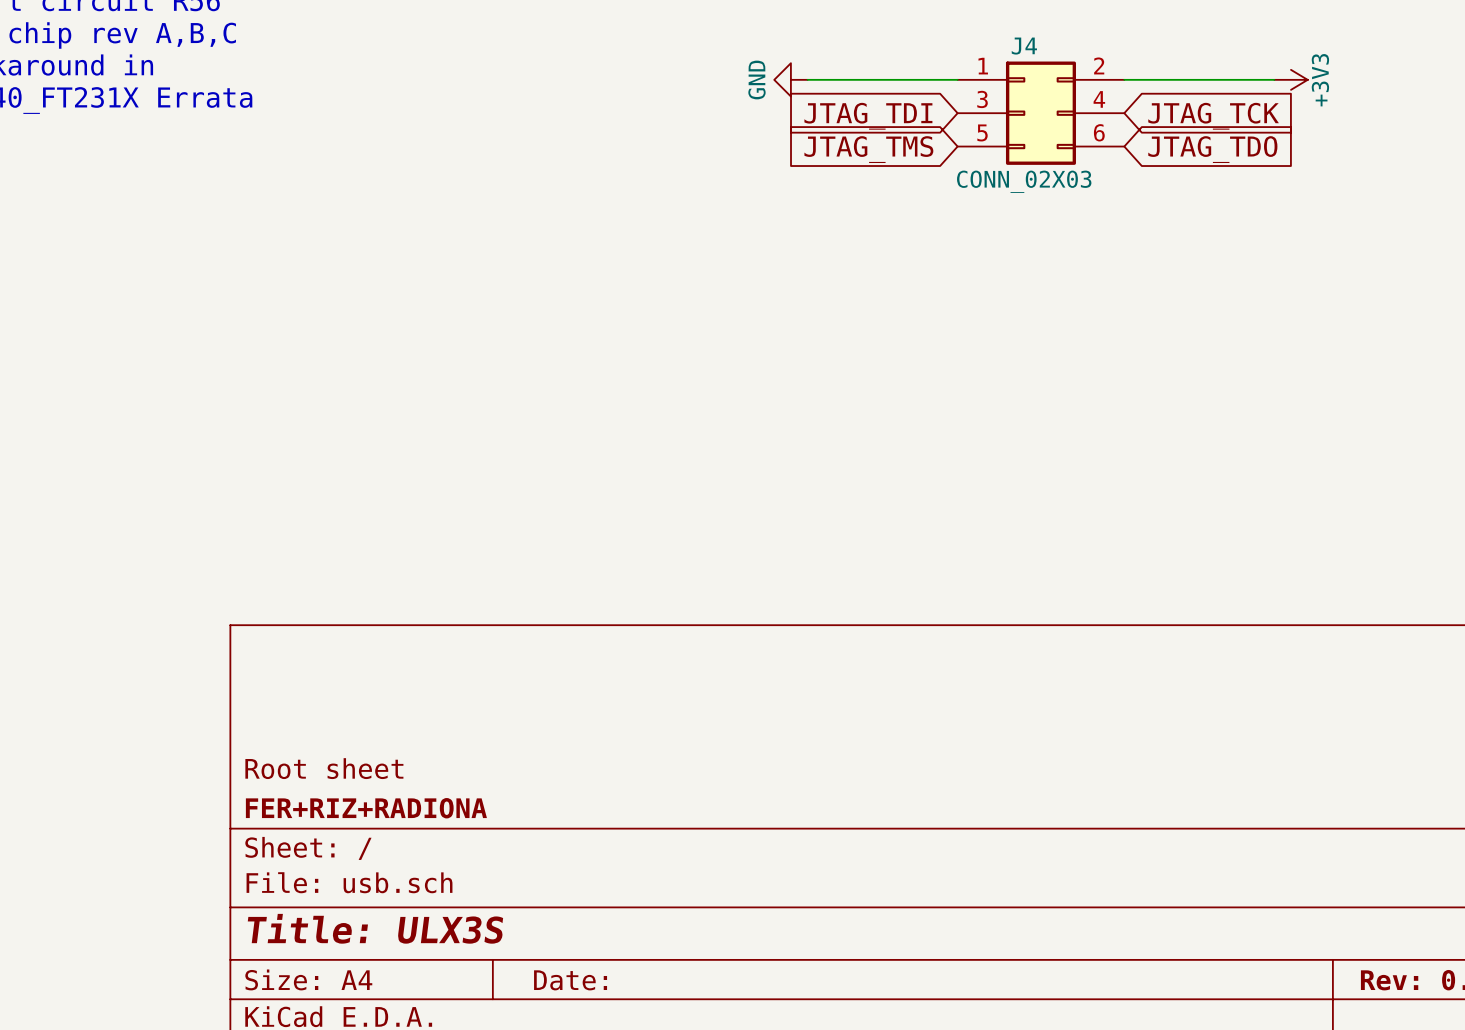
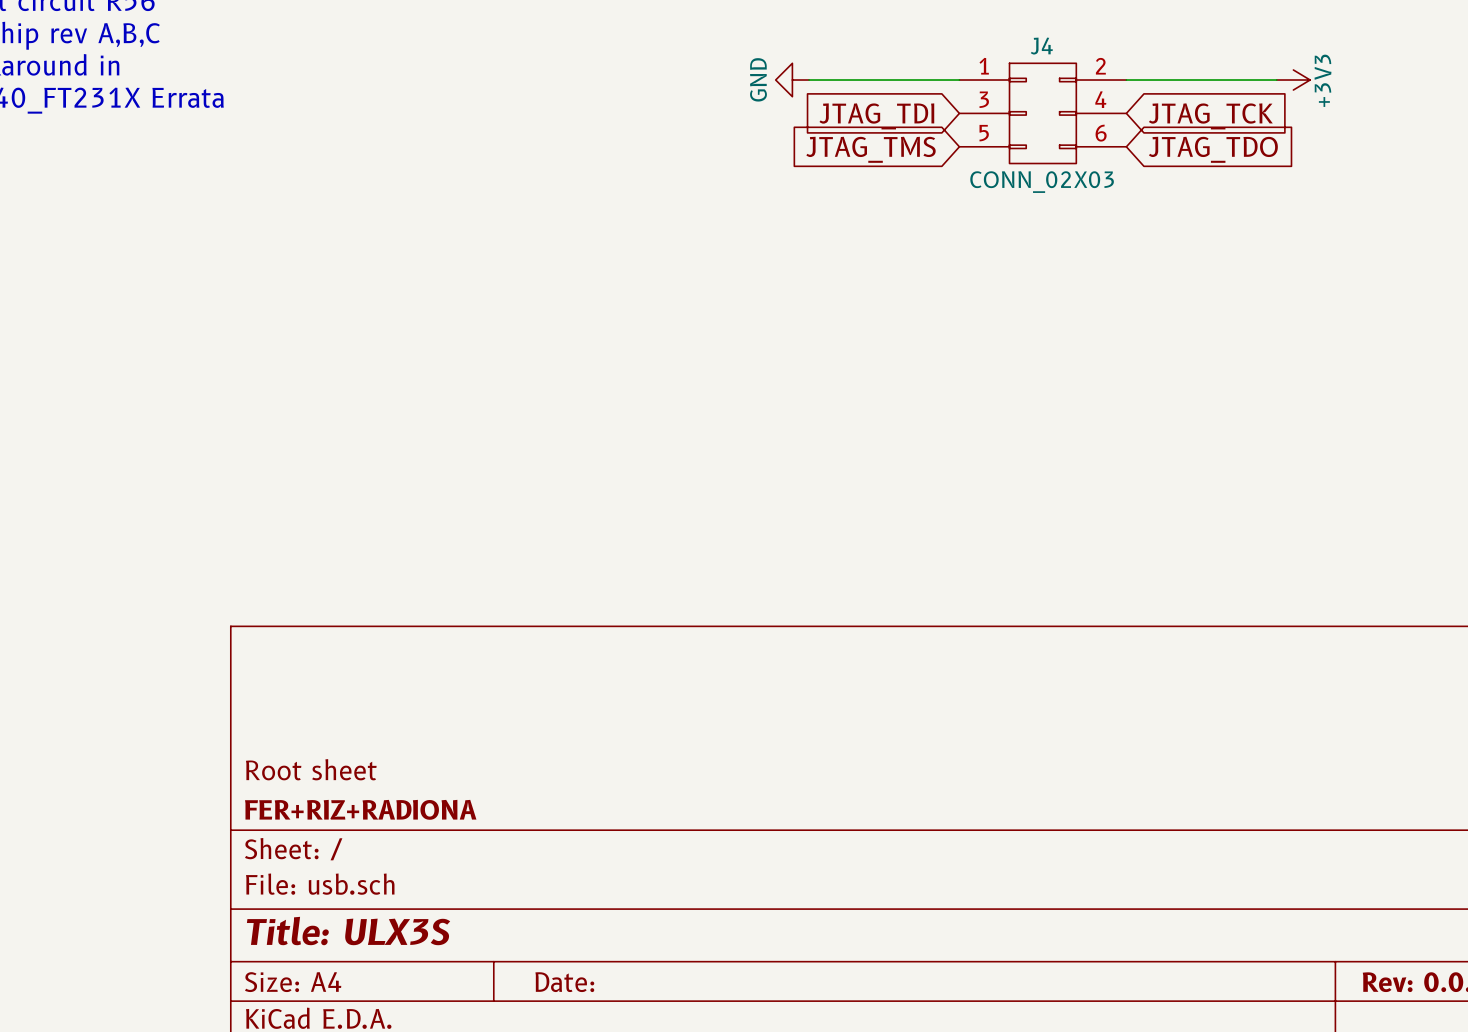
J4 symbol: [957, 61, 1125, 165] -> [959, 63, 1127, 164]

